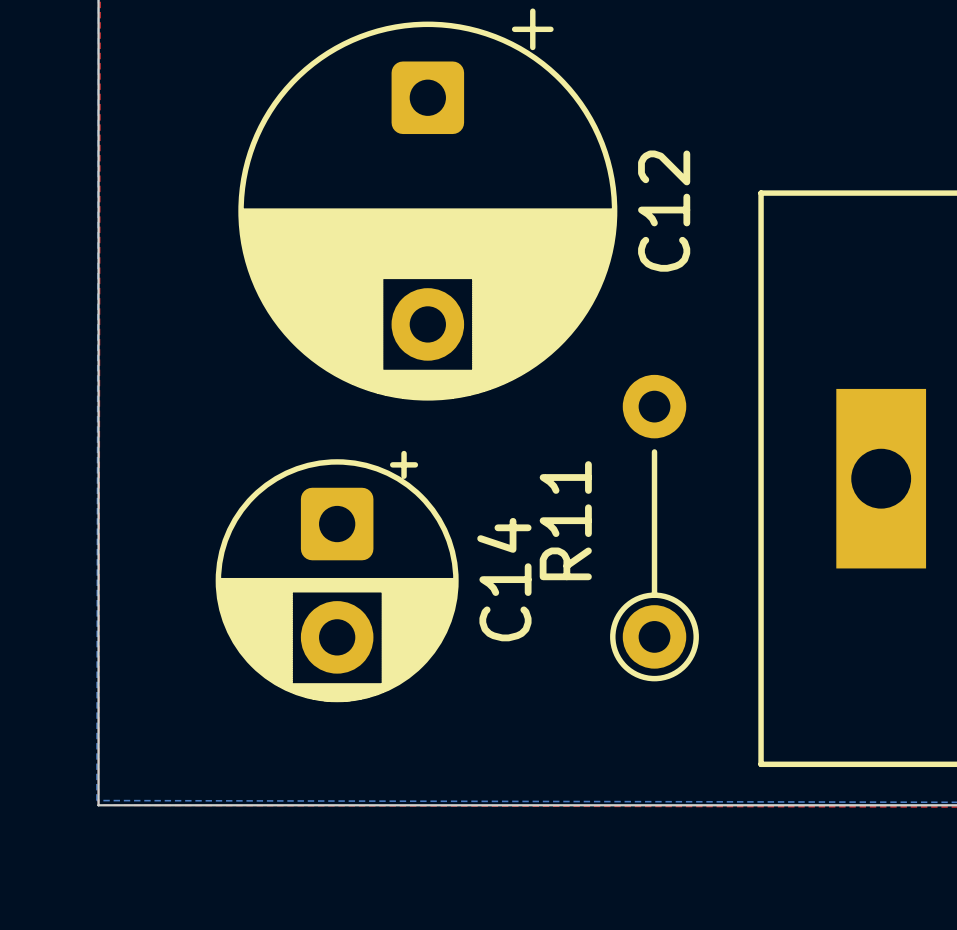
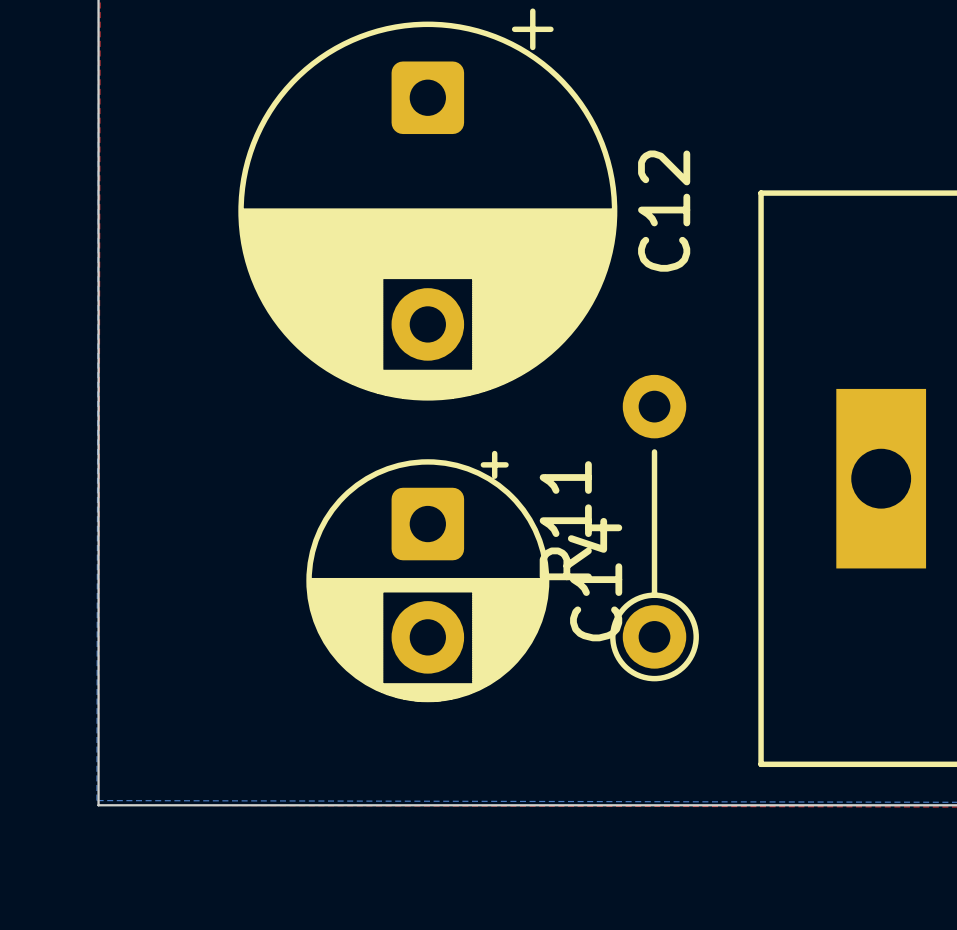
C14 position: (337, 576) -> (427, 576)

